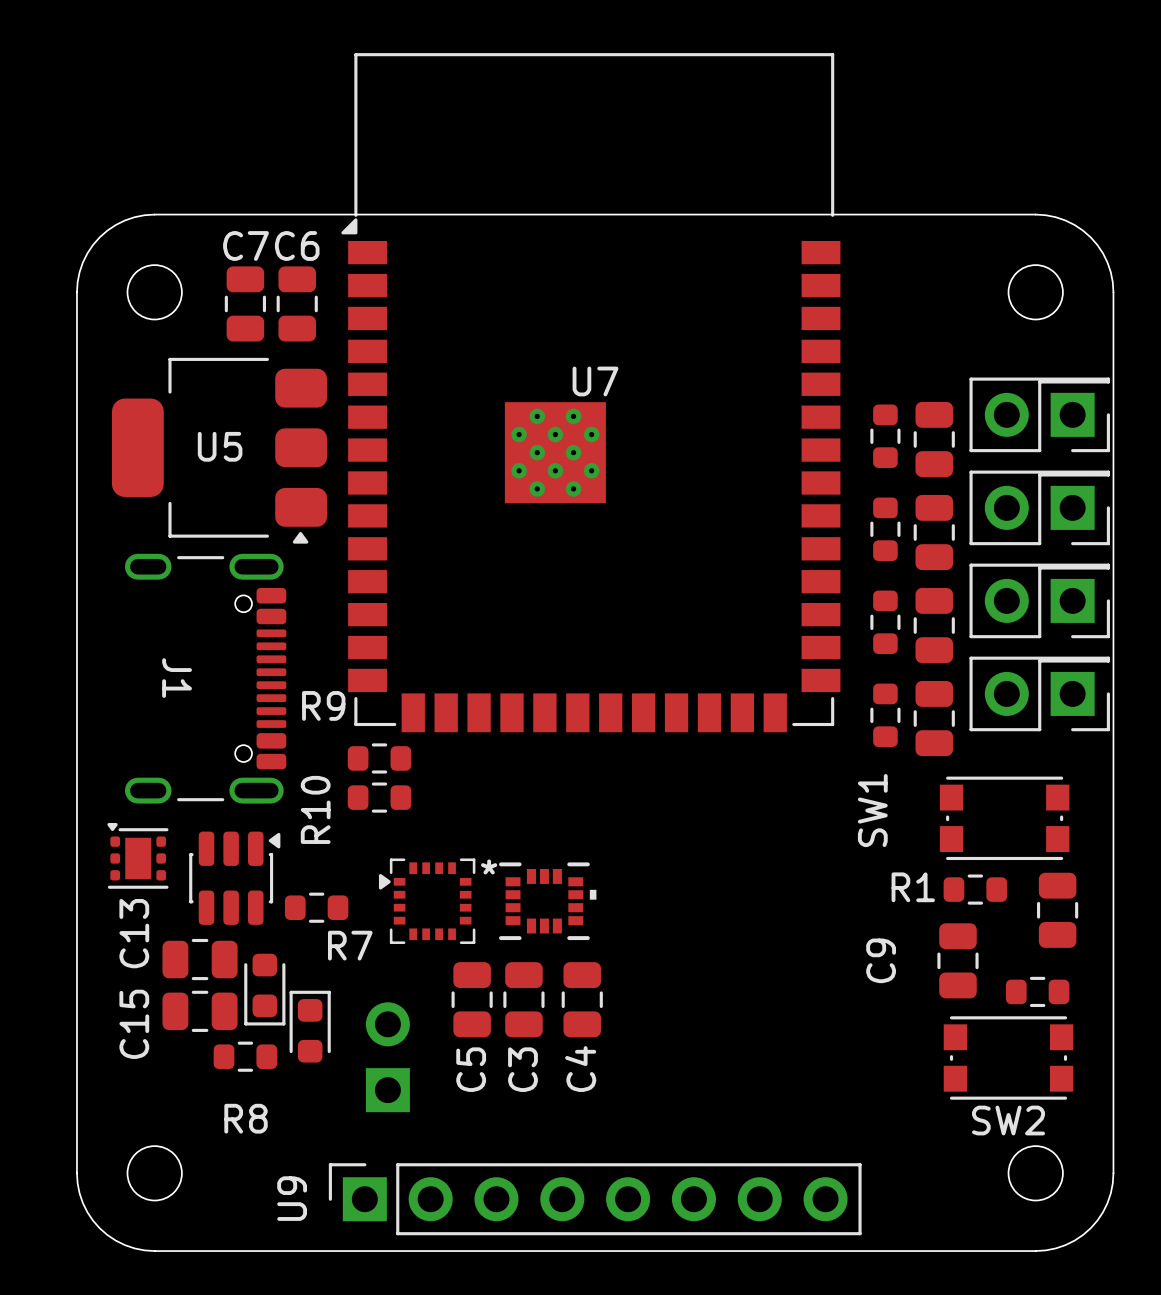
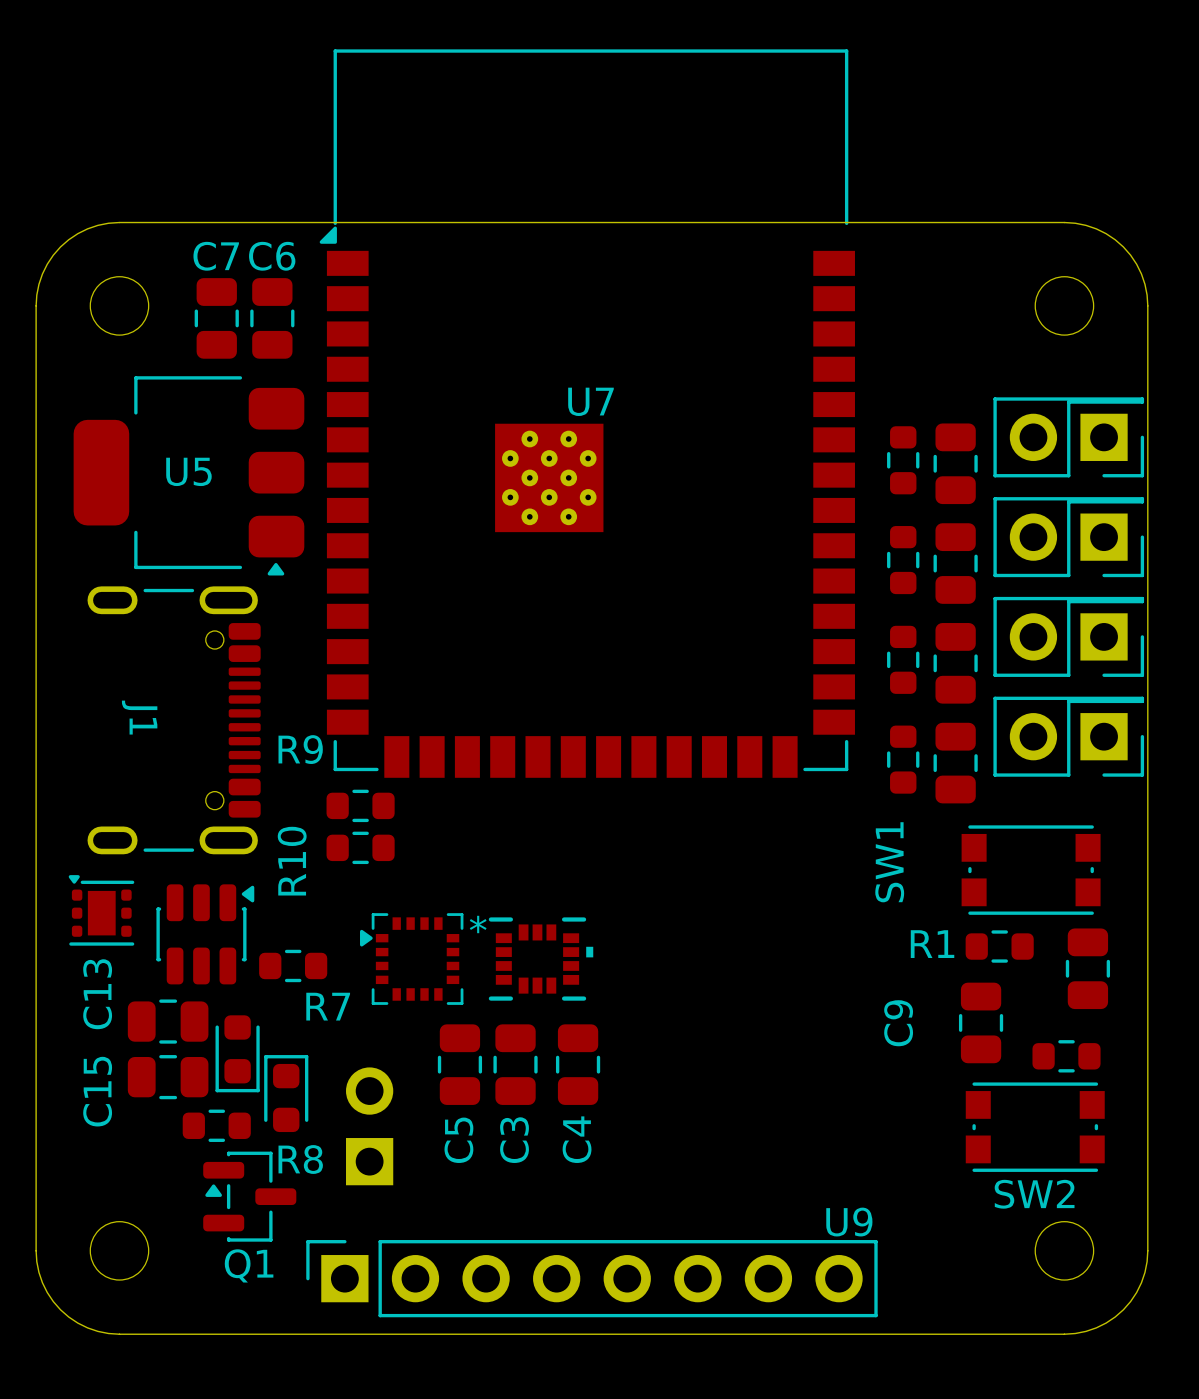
R8 name position: R8 (246, 1118) -> R8 (300, 1159)
Q1: none -> (249, 1196)
U9 name rotation: 0° (292, 1198) -> 90° clockwise (849, 1222)
U9 name position: U9 (292, 1198) -> U9 (849, 1222)

